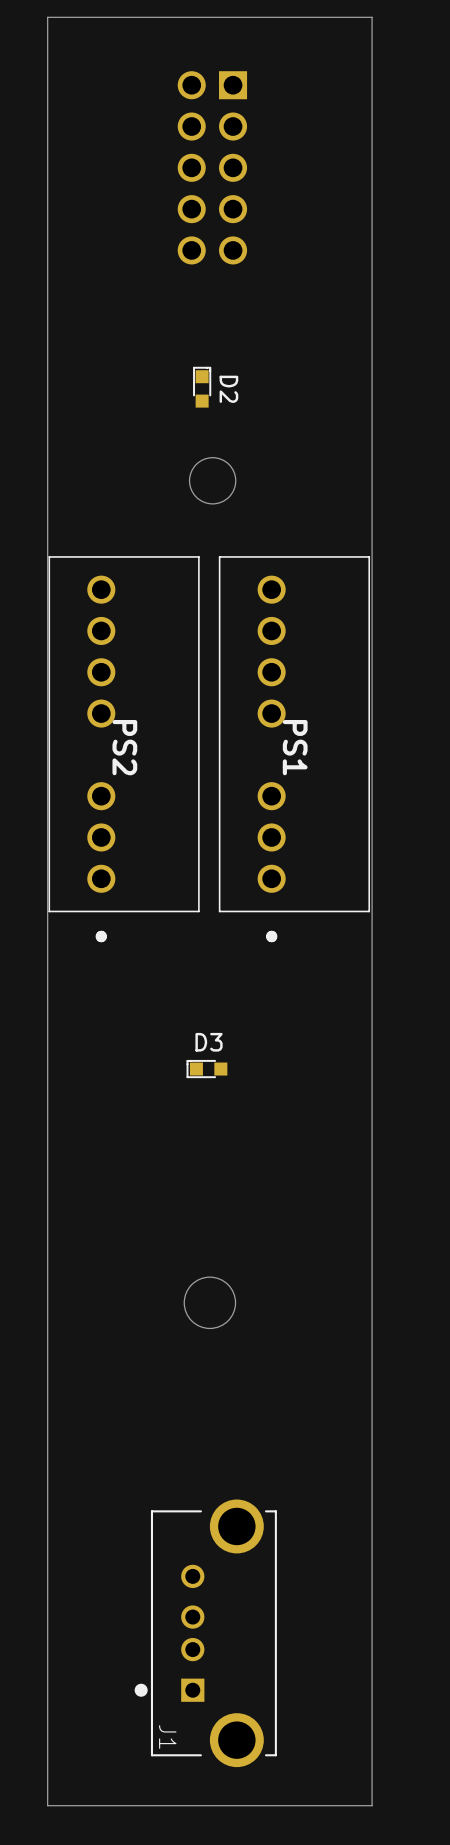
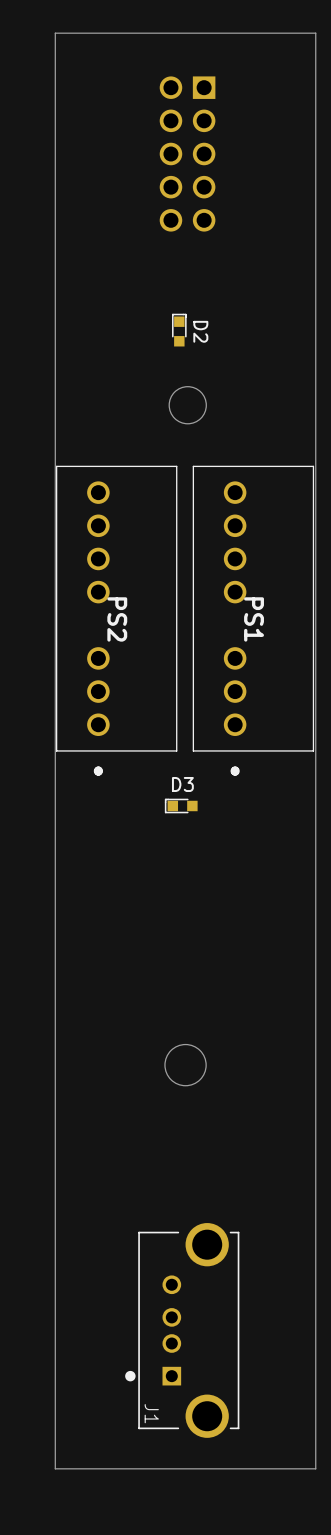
D3 position: (206, 1069) -> (181, 806)

